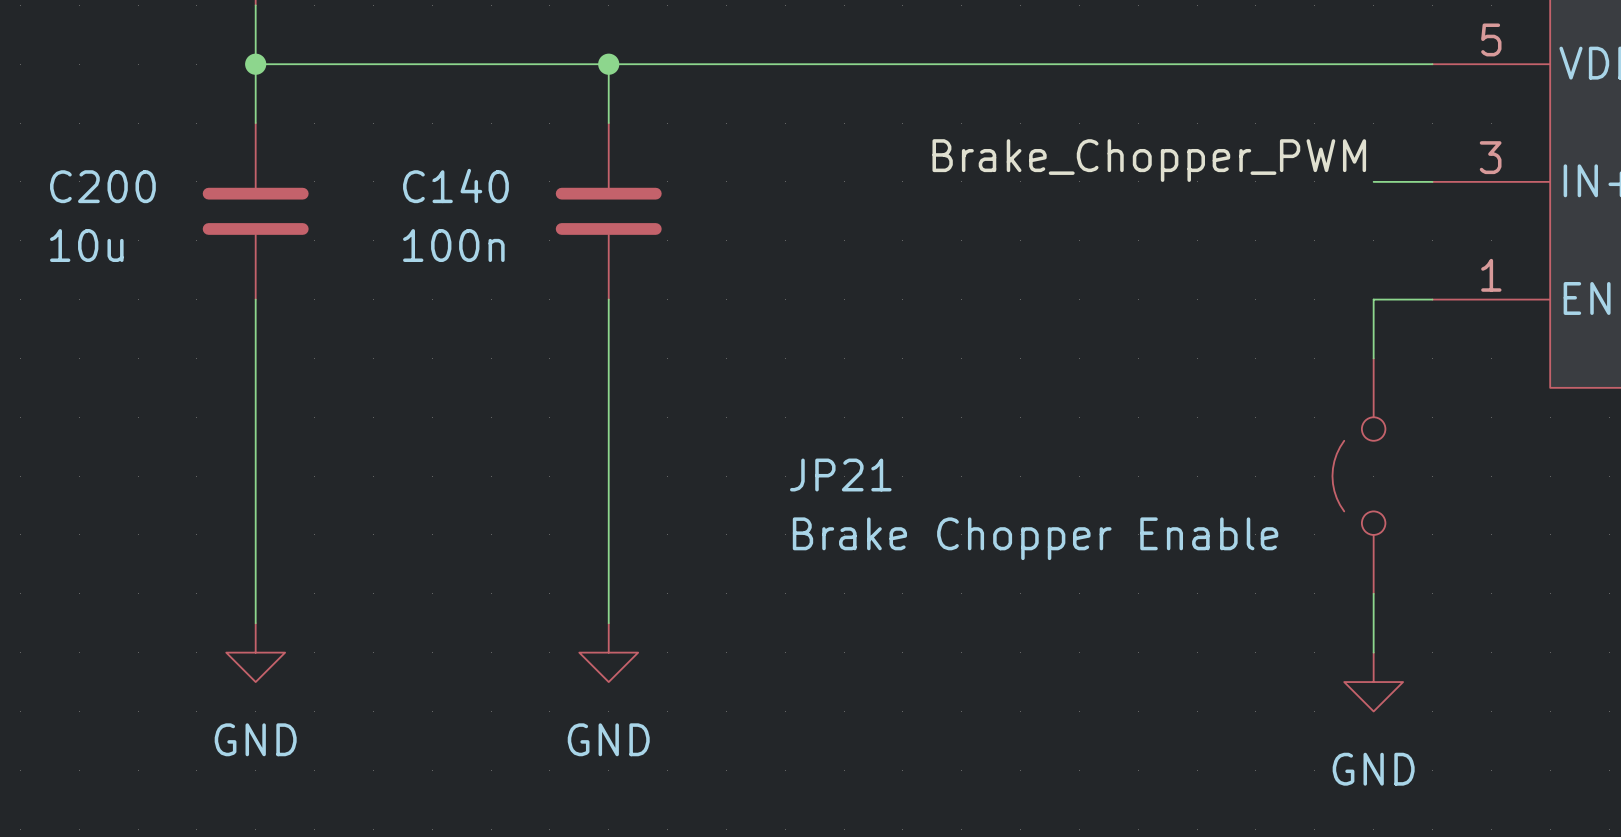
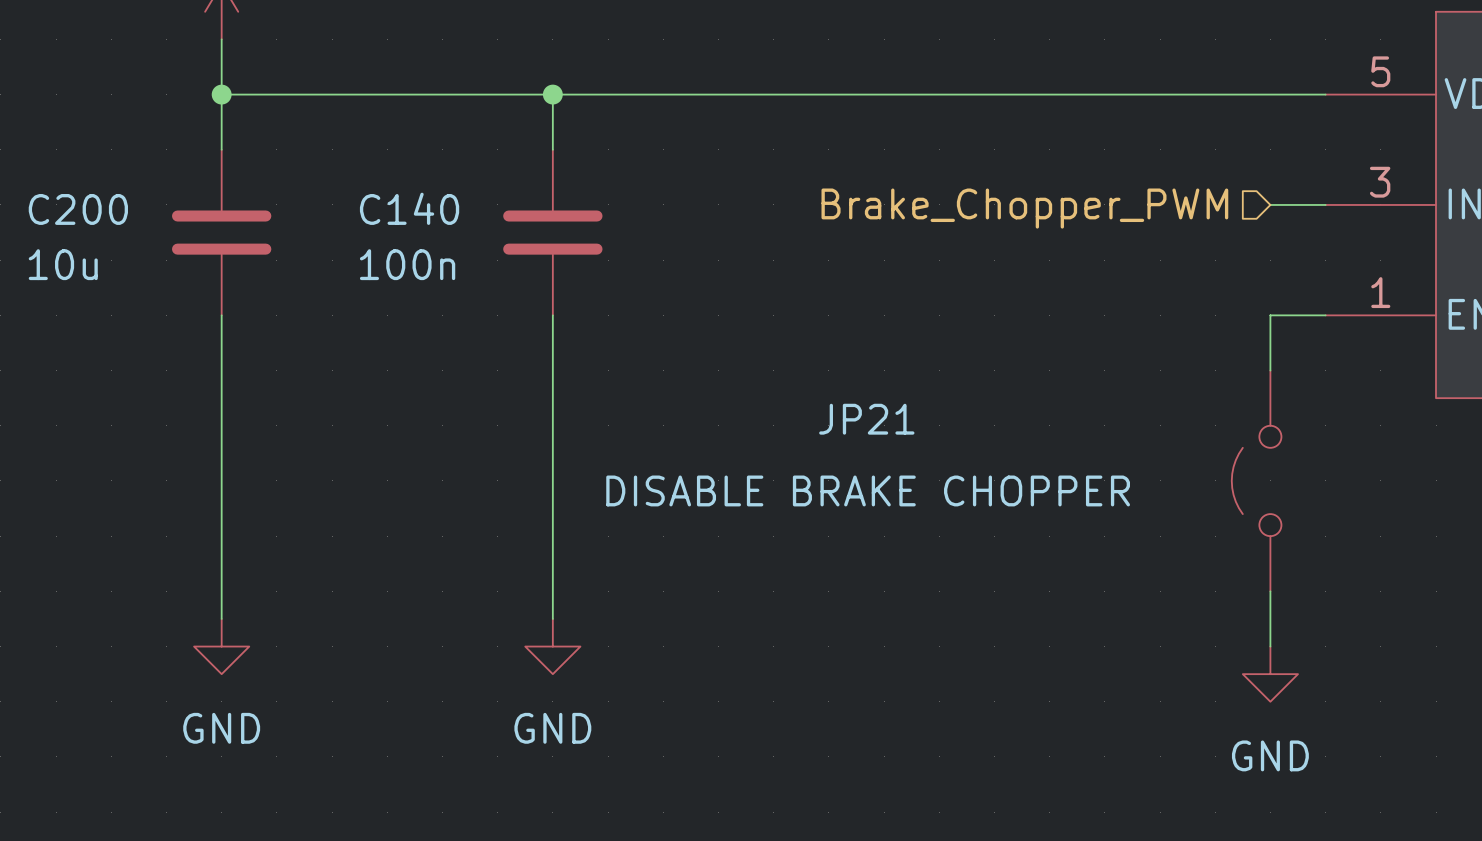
label: Brake_Chopper_PWM (1149, 160) -> none
hierarchical label: none -> Brake_Chopper_PWM (1024, 208)
JP21 name position: JP21 (840, 475) -> JP21 (866, 419)
JP21 value: Brake Chopper Enable (1035, 538) -> DISABLE BRAKE CHOPPER (868, 490)

